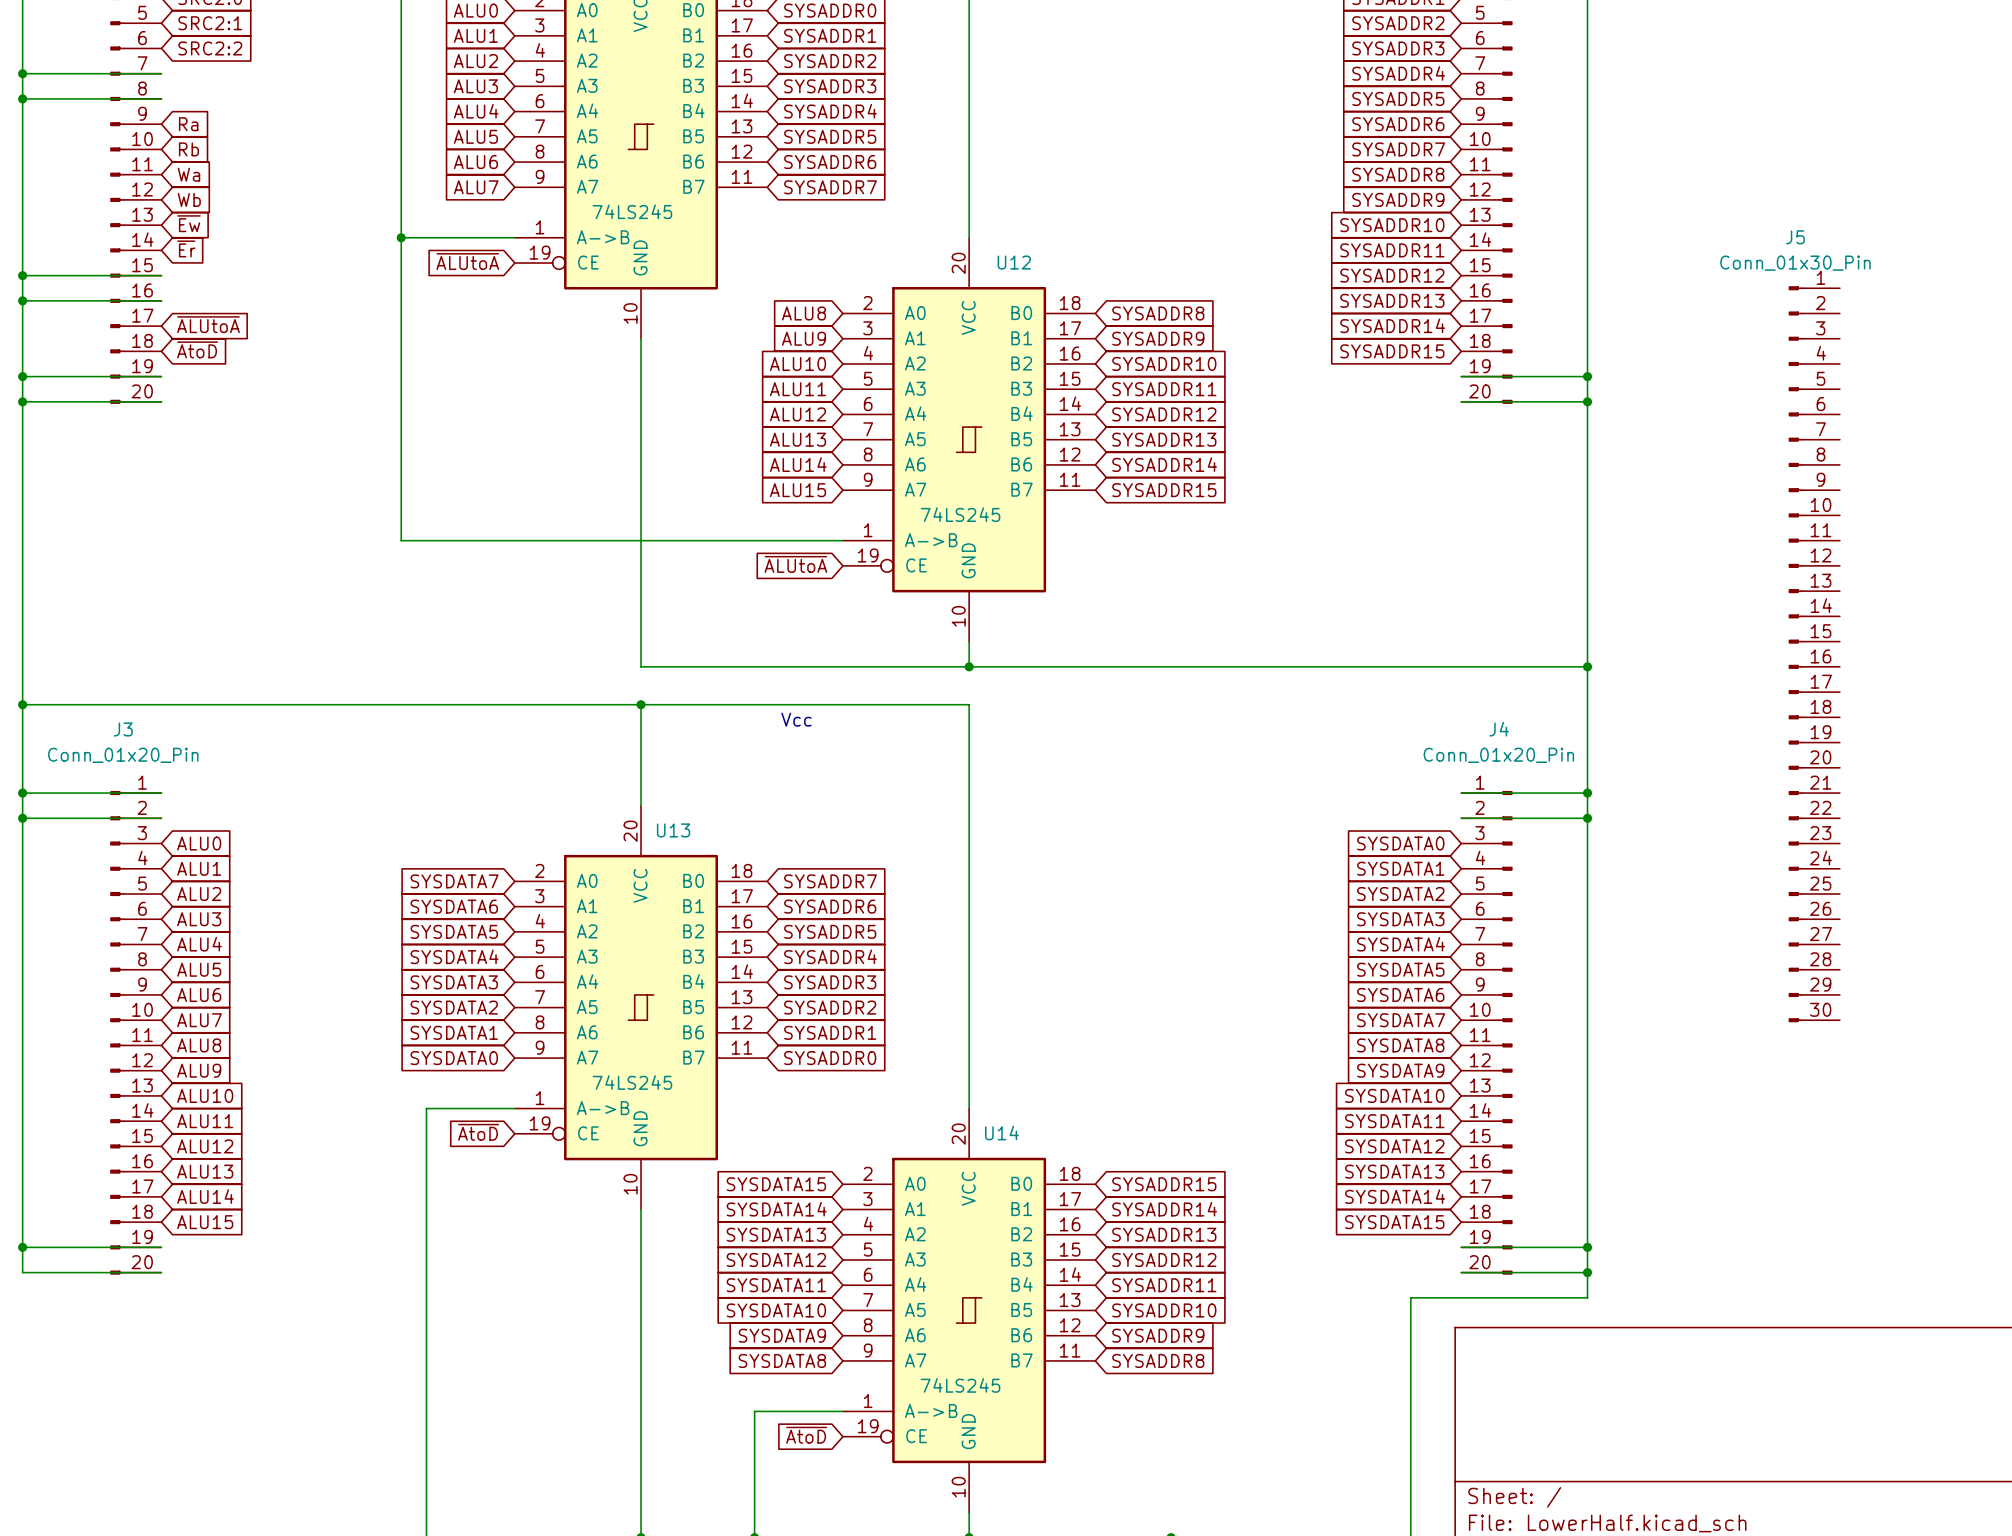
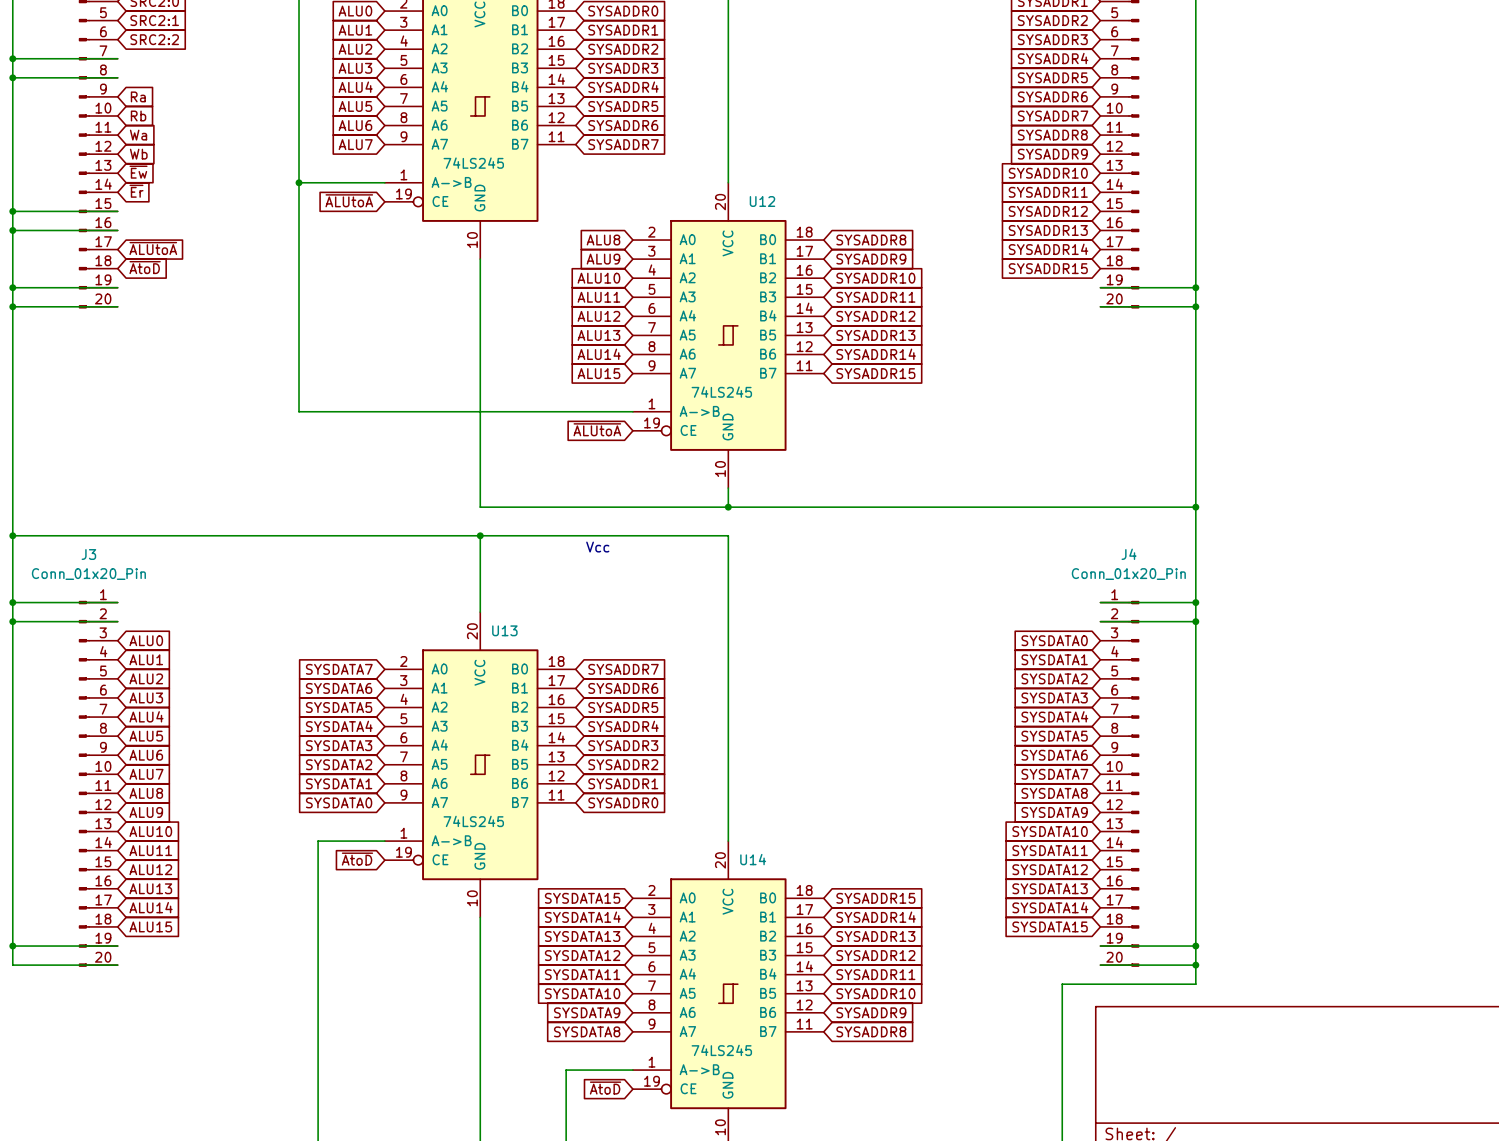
J5: Conn_01x30_Pin (1814, 654) -> none

